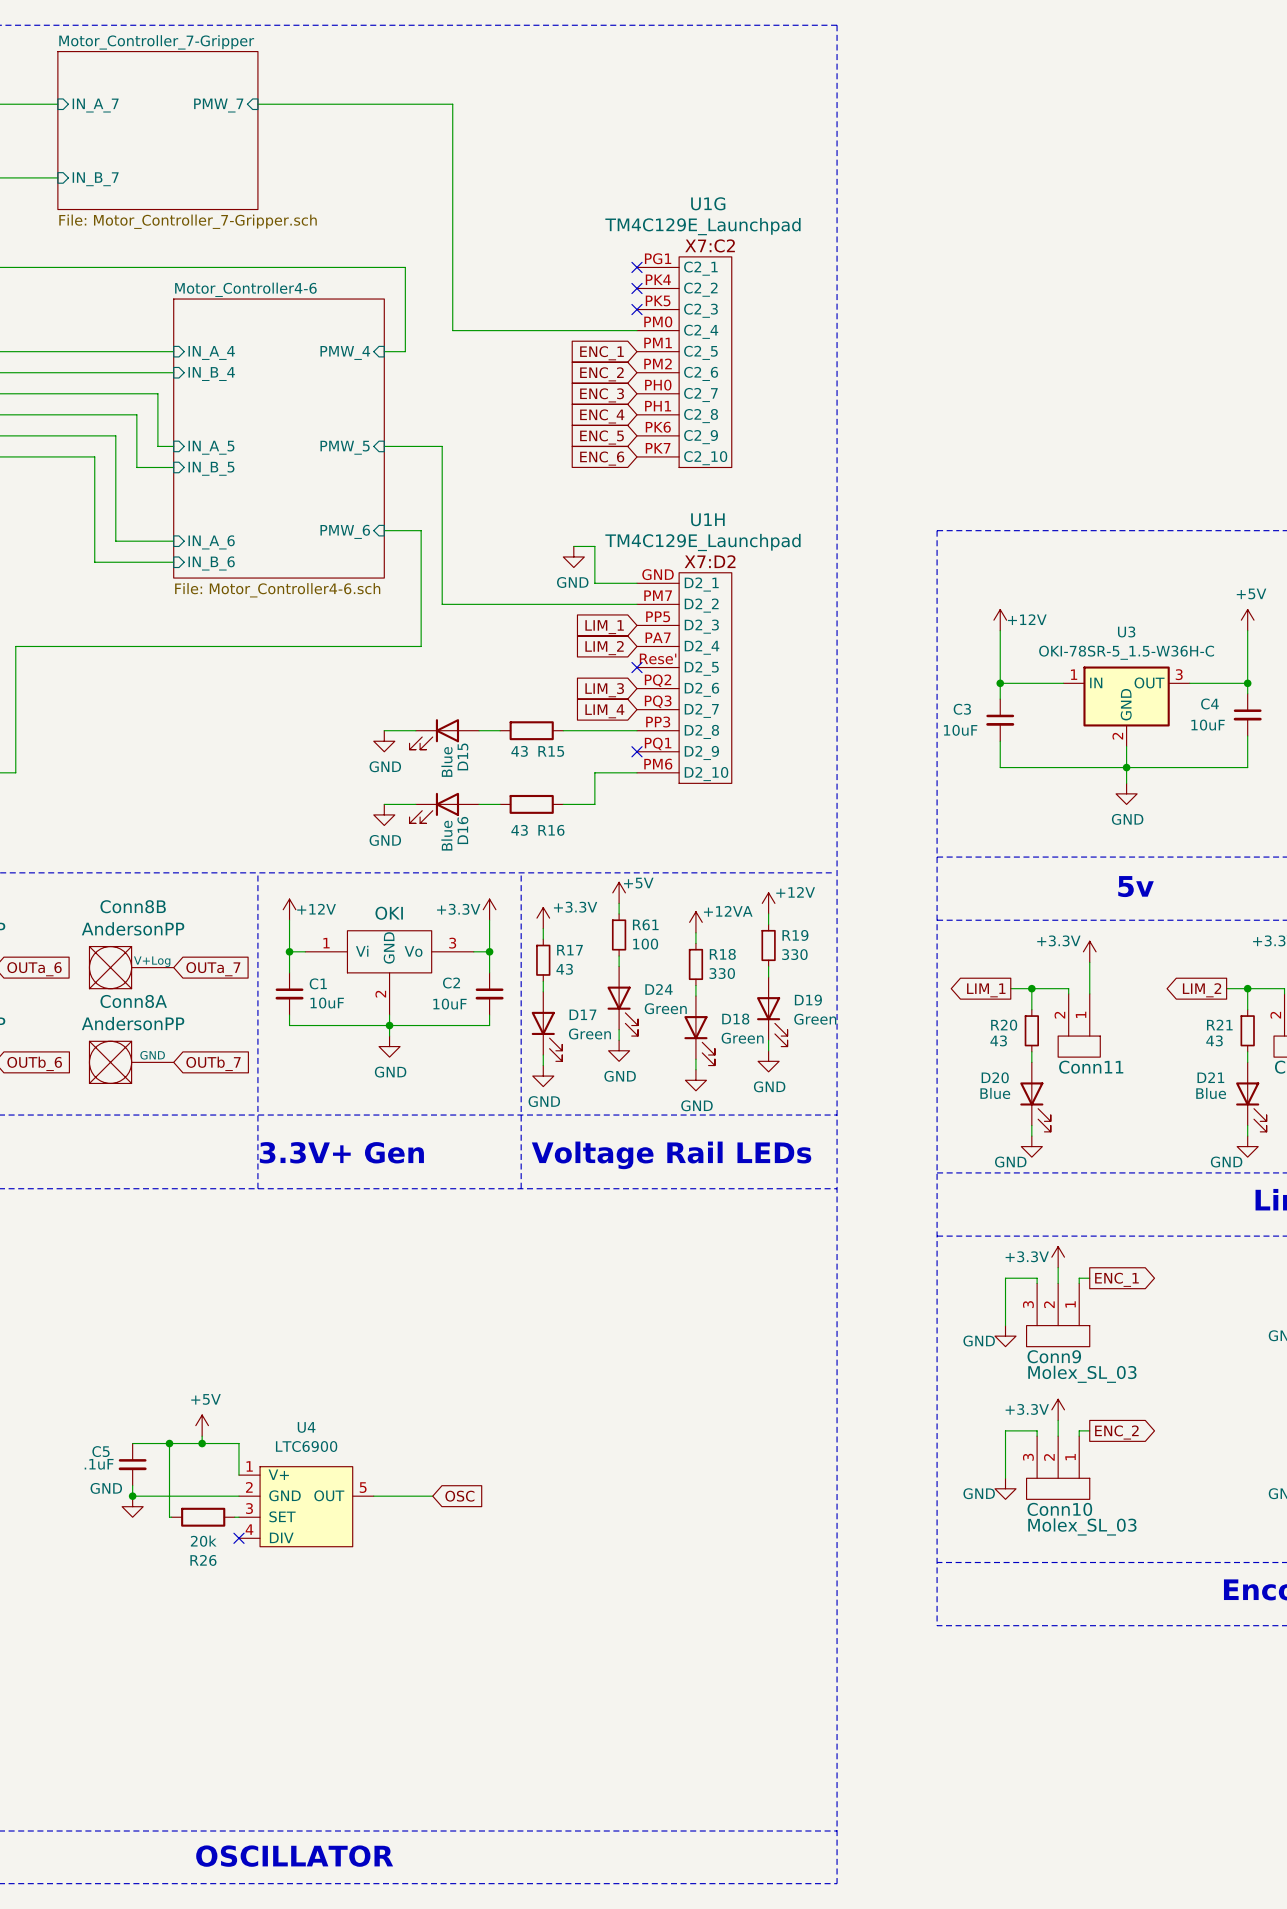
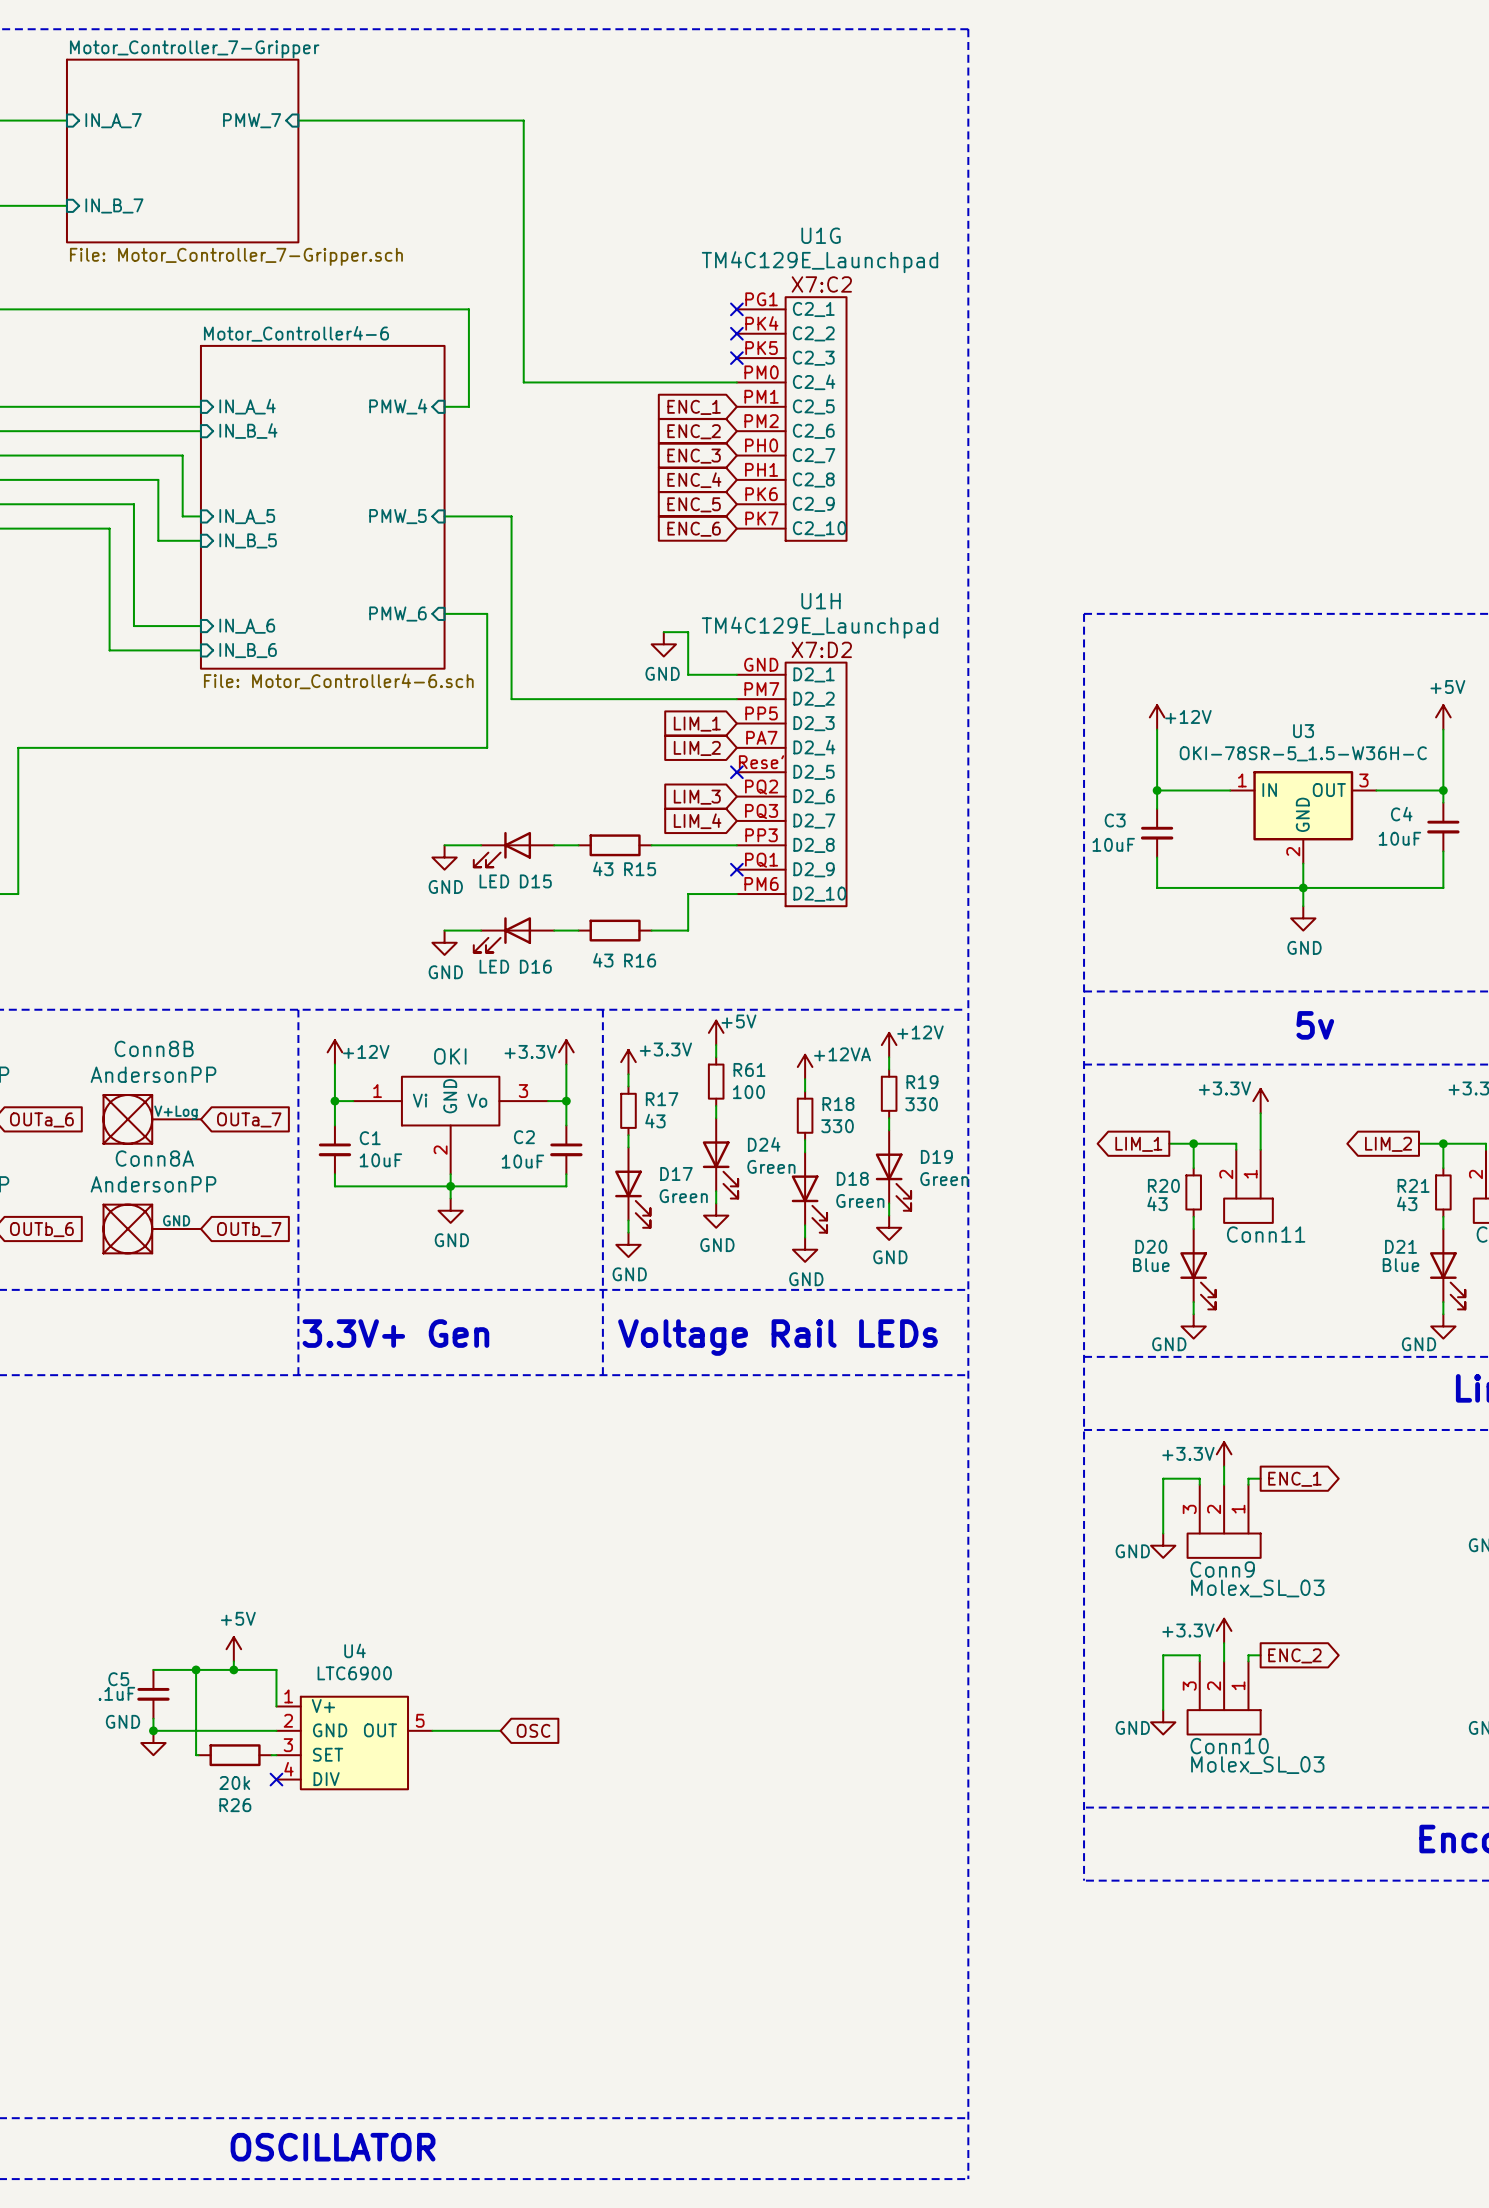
D15 name rotation: 0° (462, 756) -> 90° clockwise (535, 881)
D15 value: Blue (446, 761) -> LED (494, 881)
D16 name rotation: 0° (462, 830) -> 90° clockwise (535, 966)
D16 value: Blue (446, 835) -> LED (494, 966)

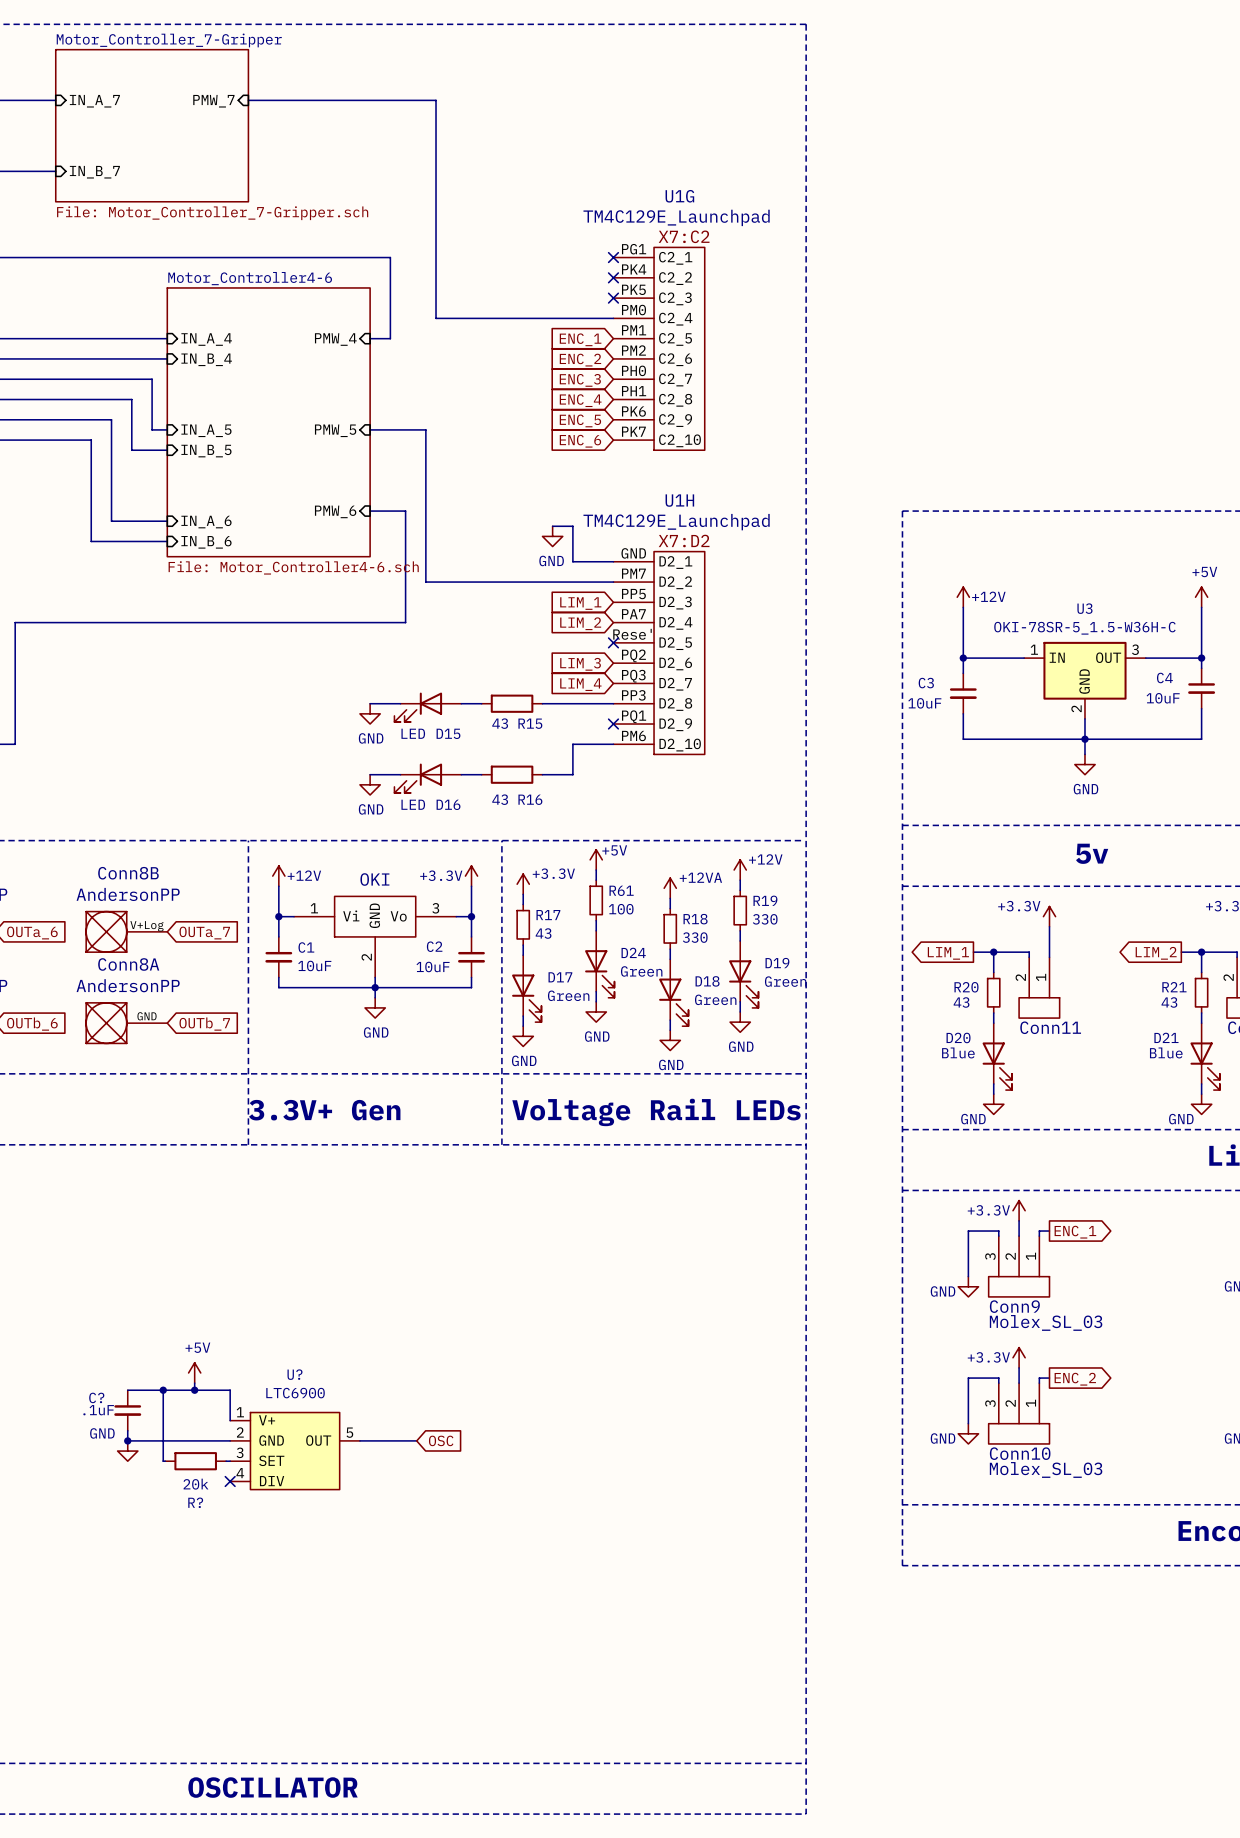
U4 name: U4 (355, 1650) -> U? (294, 1374)
C5 name: C5 (118, 1679) -> C? (96, 1397)
R26 name: R26 (235, 1805) -> R? (195, 1502)

